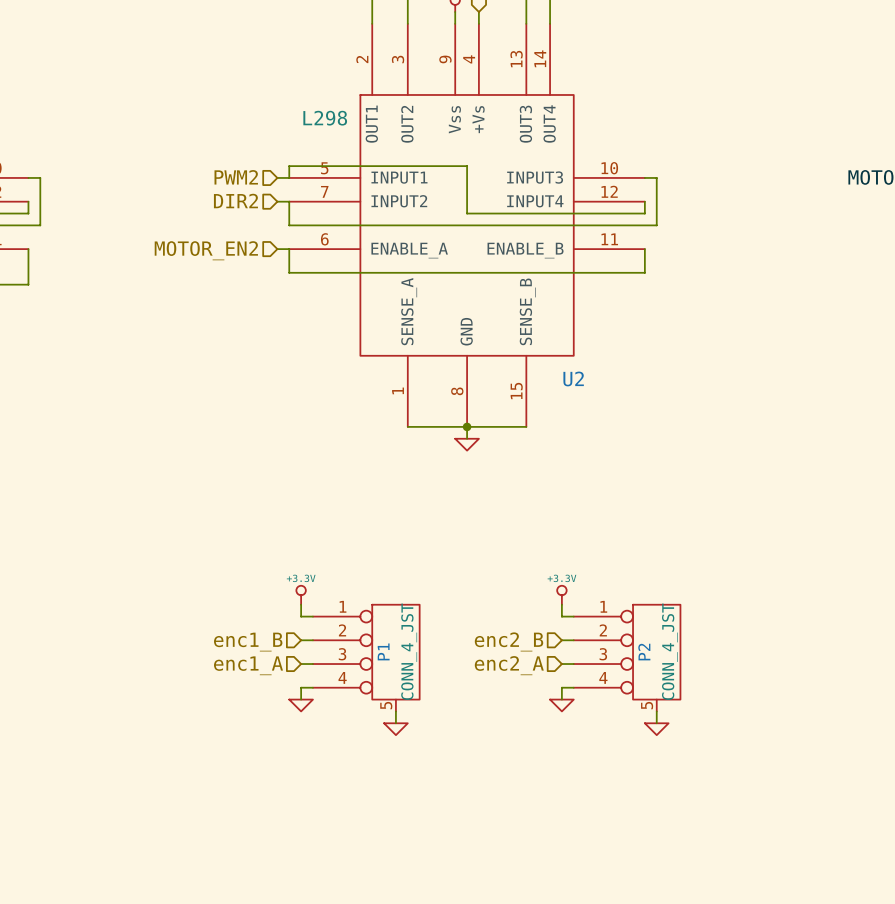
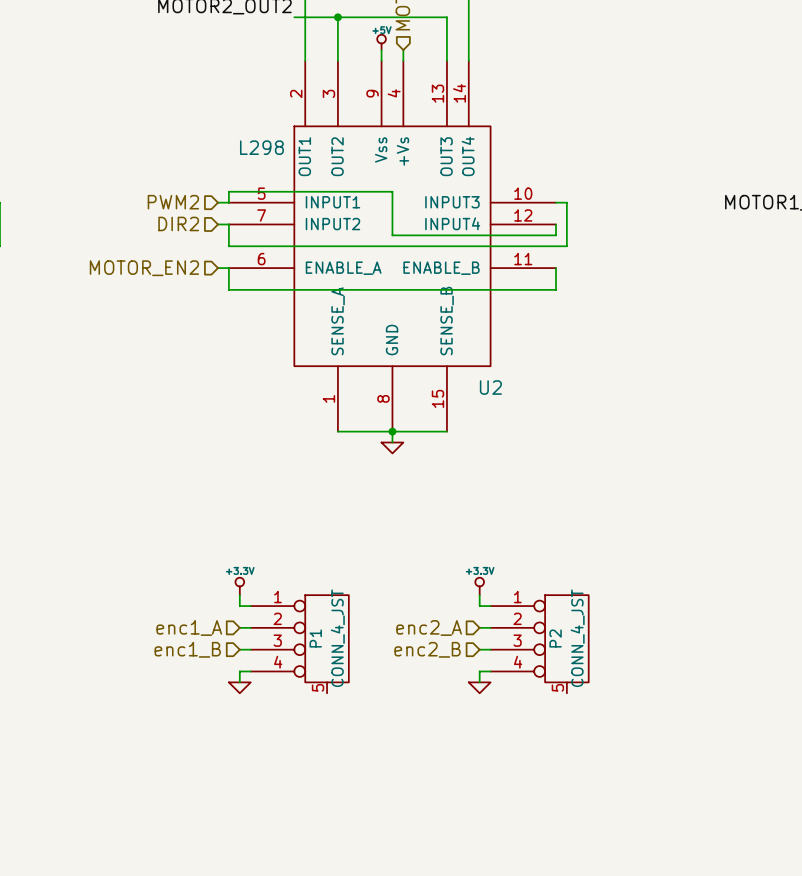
hierarchical label: enc2_B (509, 641) -> enc2_A (429, 628)
hierarchical label: enc1_B (248, 642) -> enc1_A (189, 628)
hierarchical label: enc1_A (248, 665) -> enc1_B (187, 649)
hierarchical label: enc2_A (509, 665) -> enc2_B (427, 649)
wire: (395, 711) (395, 723) -> none
wire: (656, 711) (656, 723) -> none
power symbol: (395, 729) -> none
power symbol: (656, 729) -> none

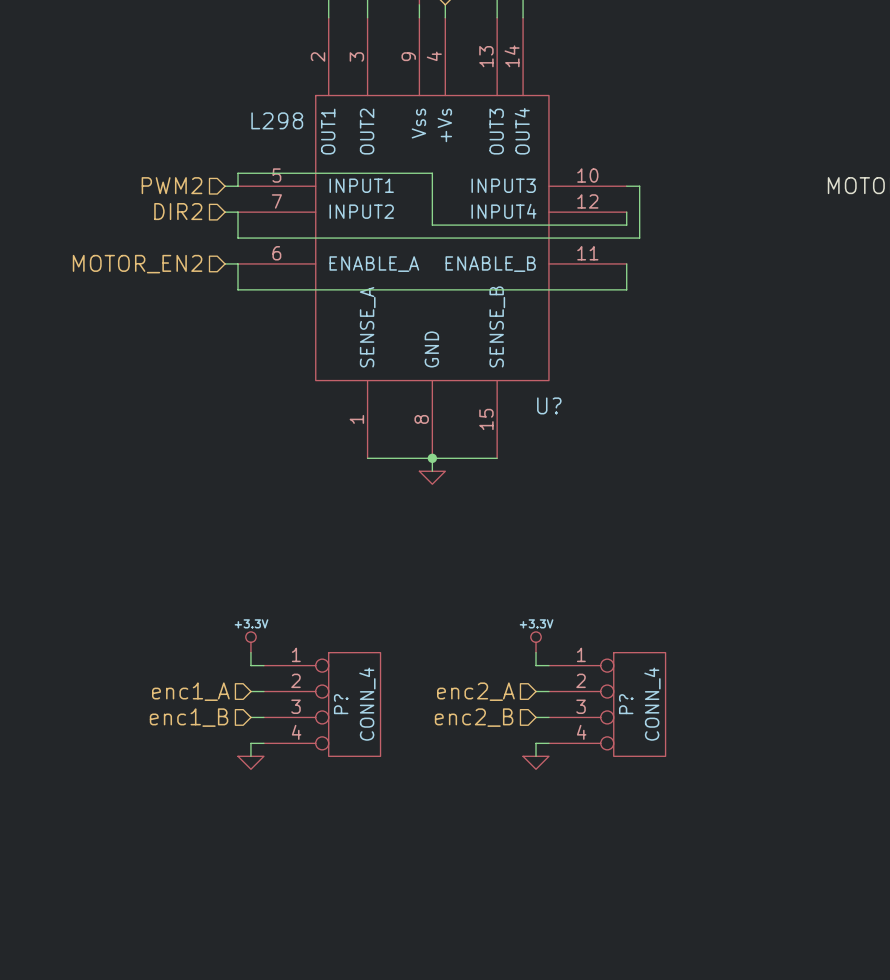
U2 name: U2 (490, 387) -> U? (549, 405)
P?: none -> CONN_4 (322, 704)
P?: none -> CONN_4 (607, 704)
P1: CONN_4_JST (299, 644) -> none
P2: CONN_4_JST (539, 644) -> none

